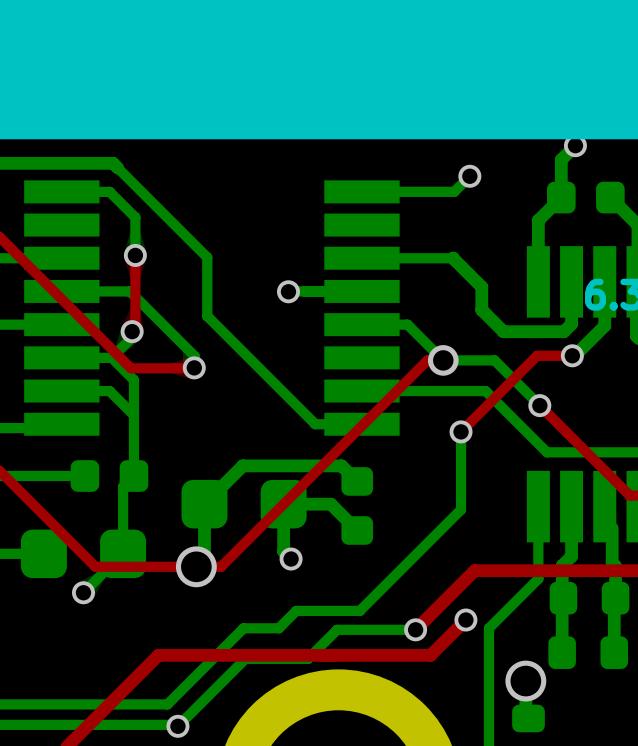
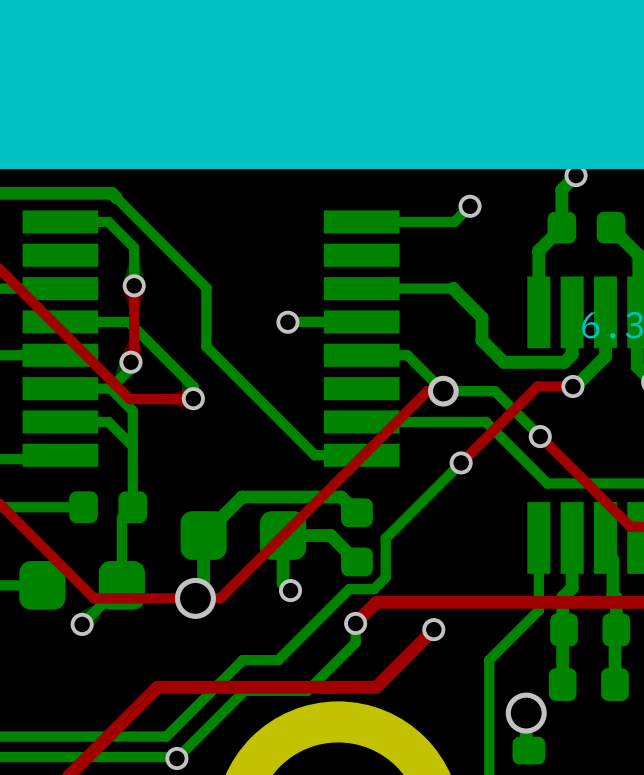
bottom track: (461, 431) (461, 509) (359, 610) (296, 610) -> (461, 462) (385, 538) (385, 577) (374, 589) (349, 589) (295, 642)
top track: (474, 570) (415, 629) -> (474, 602) (376, 602) (355, 623)
via: none -> (355, 623)
via: none -> (433, 629)
top track: (465, 620) (430, 655) (376, 655) -> (433, 629) (376, 687)
via: (465, 620) -> none
bottom track: (337, 629) (415, 629) -> (336, 661) (355, 642) (355, 623)
via: (415, 629) -> none

